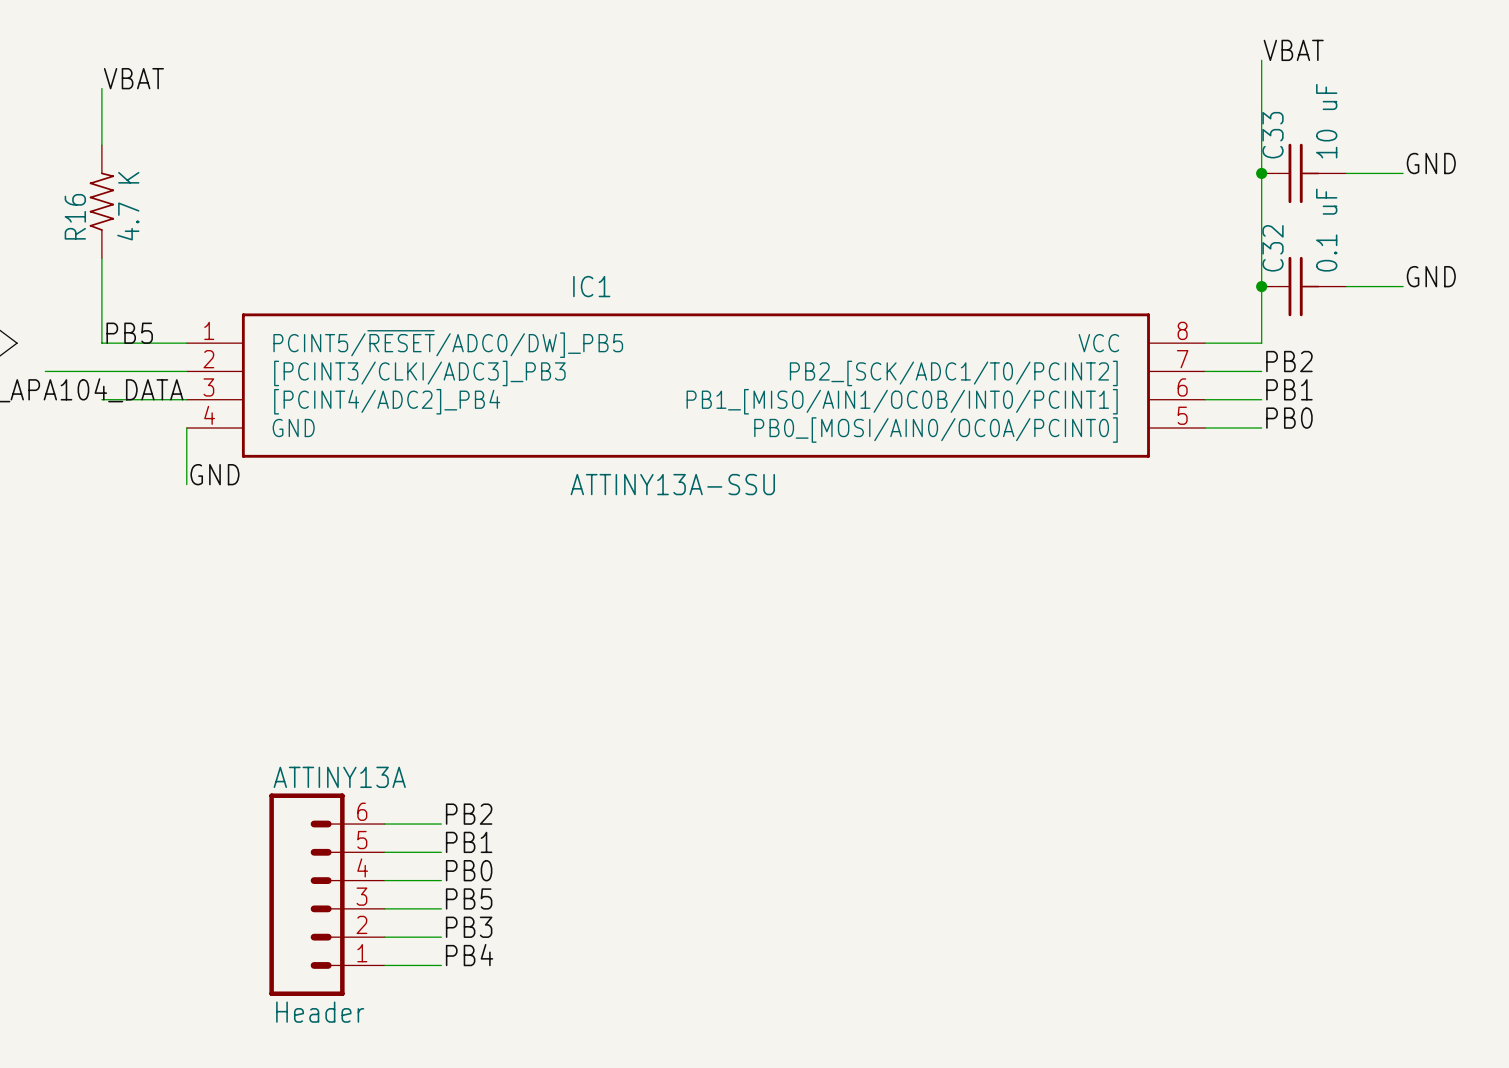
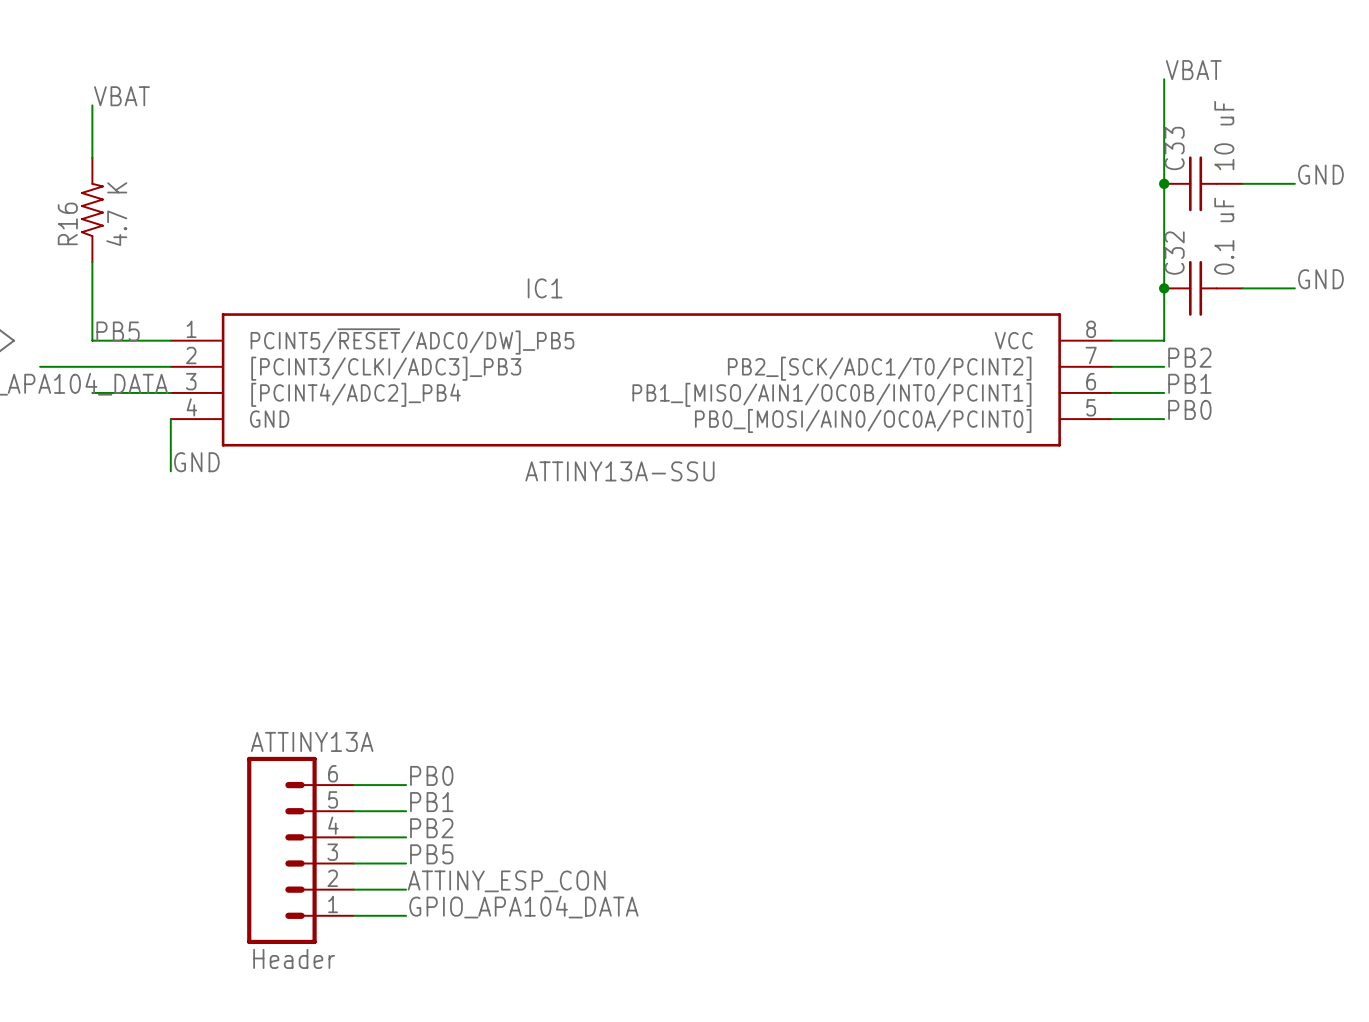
label: PB2 (469, 814) -> PB0 (431, 775)
label: PB0 (469, 870) -> PB2 (431, 828)
label: PB3 (469, 927) -> ATTINY_ESP_CON (506, 881)
label: PB4 (469, 955) -> GPIO_APA104_DATA (523, 907)

